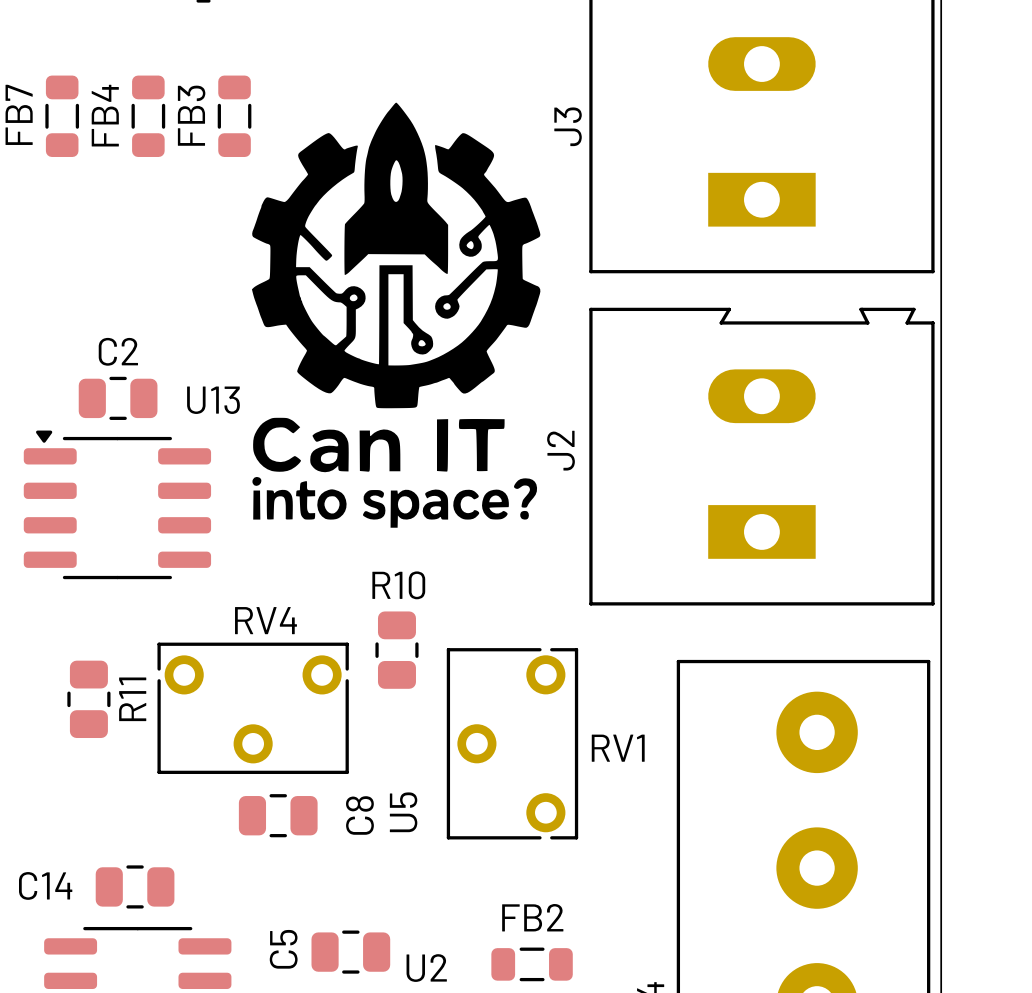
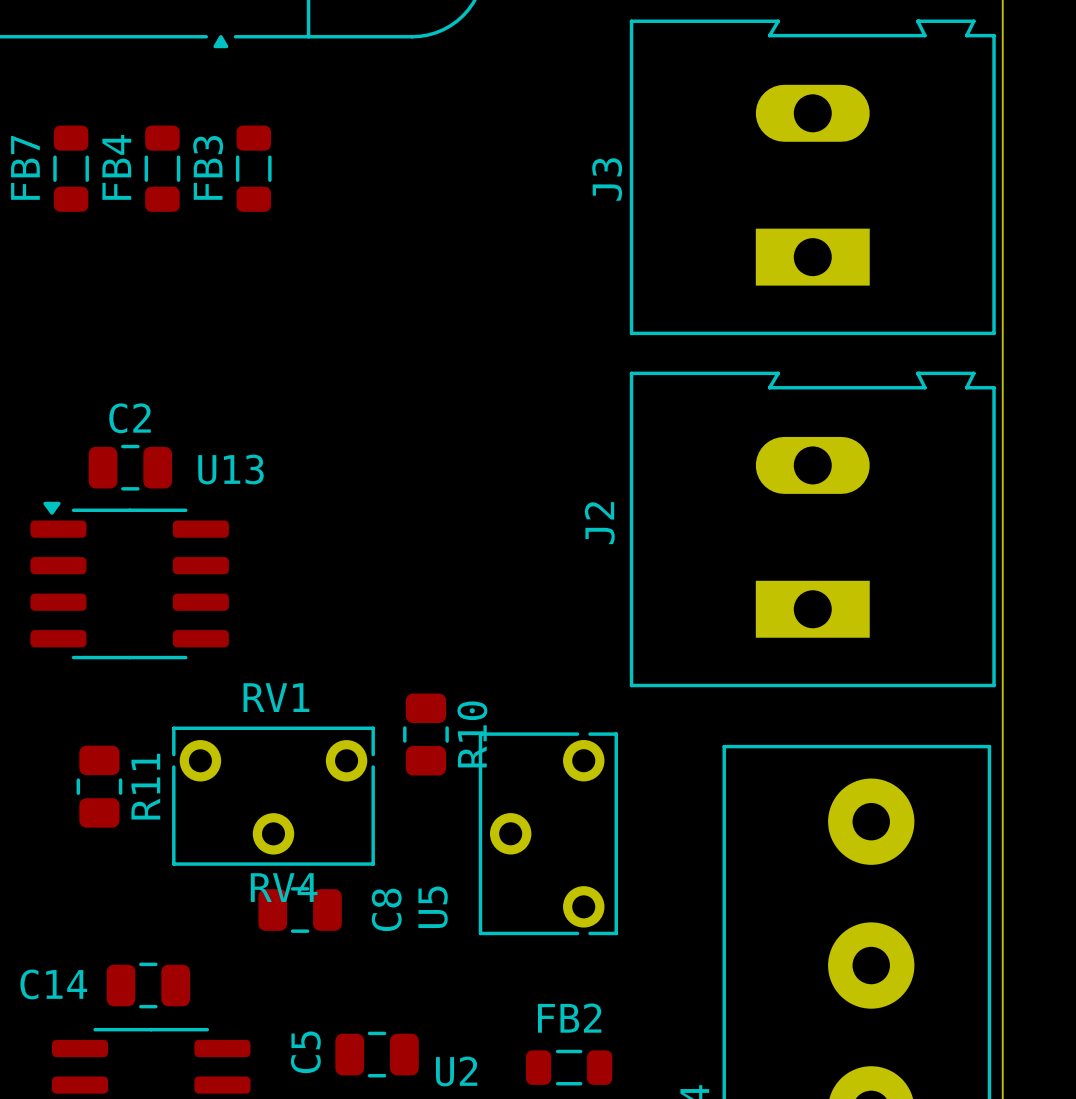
drawing: [251, 102, 541, 528] -> none
R10 name rotation: 0° (398, 585) -> 90° counterclockwise (472, 734)
RV4 name position: RV4 (265, 620) -> RV4 (284, 887)
RV1 name position: RV1 (618, 748) -> RV1 (276, 697)

